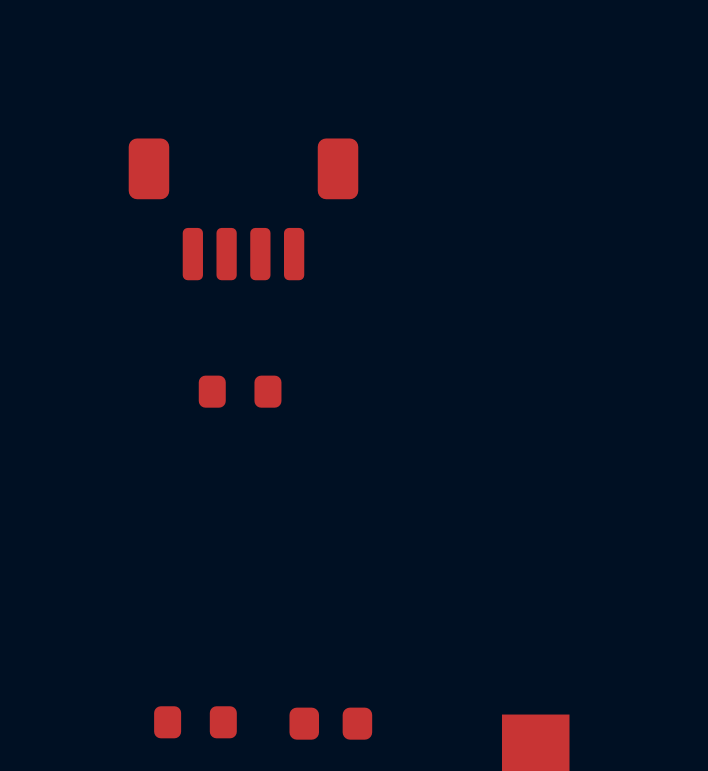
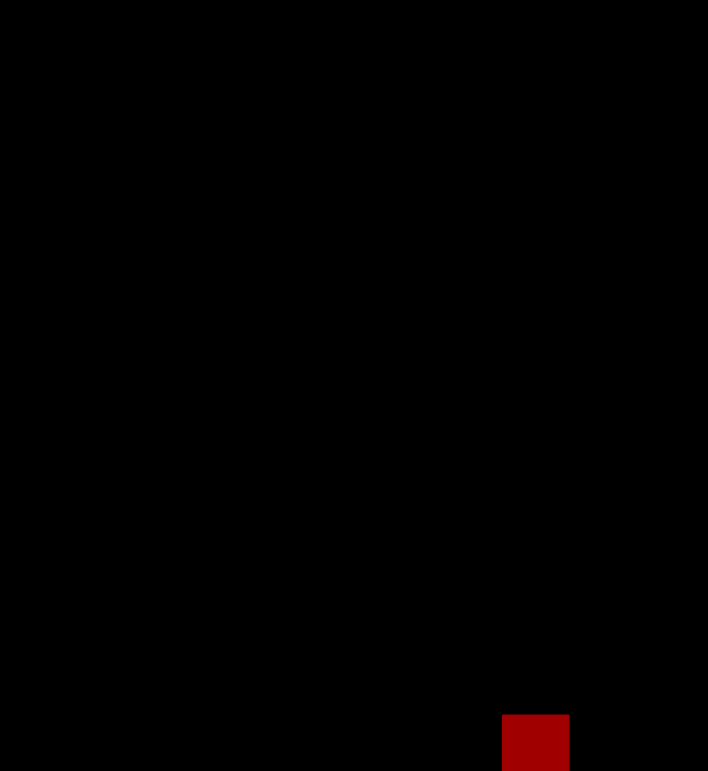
part: (243, 209) -> none
part: (240, 391) -> none
part: (195, 722) -> none
part: (330, 723) -> none

